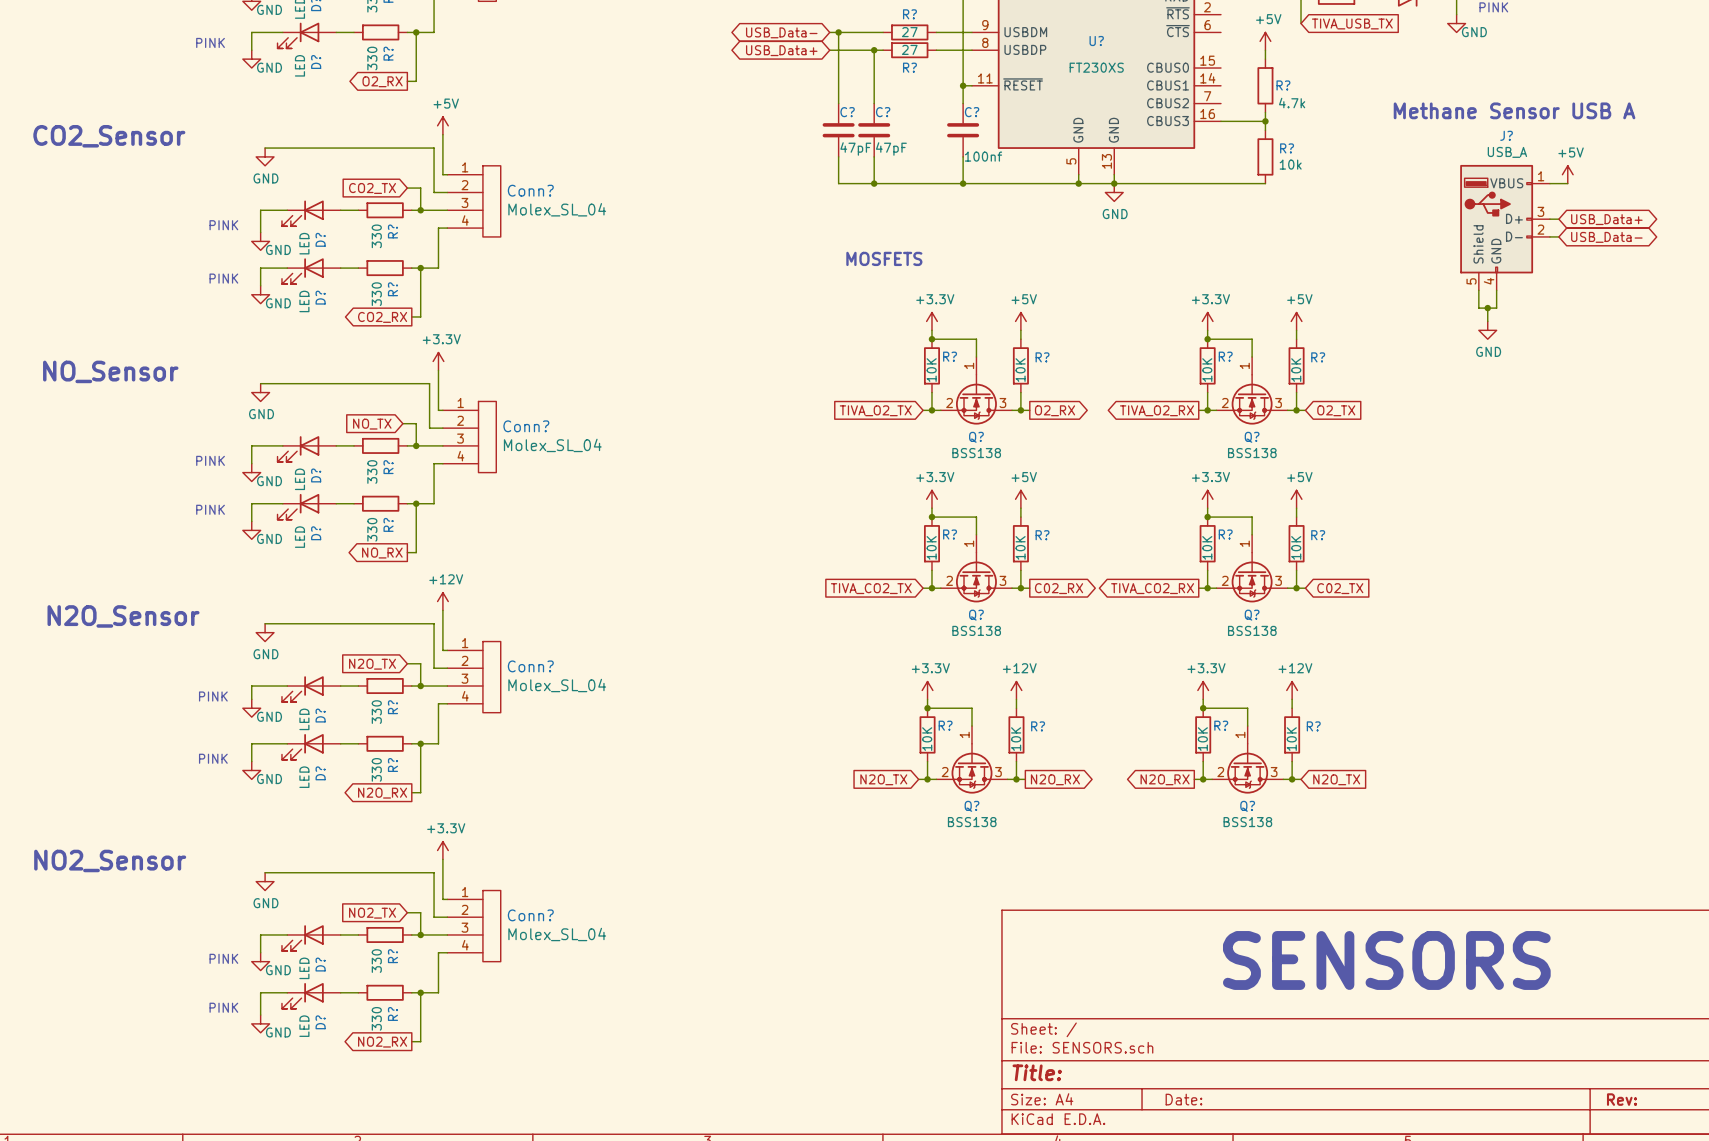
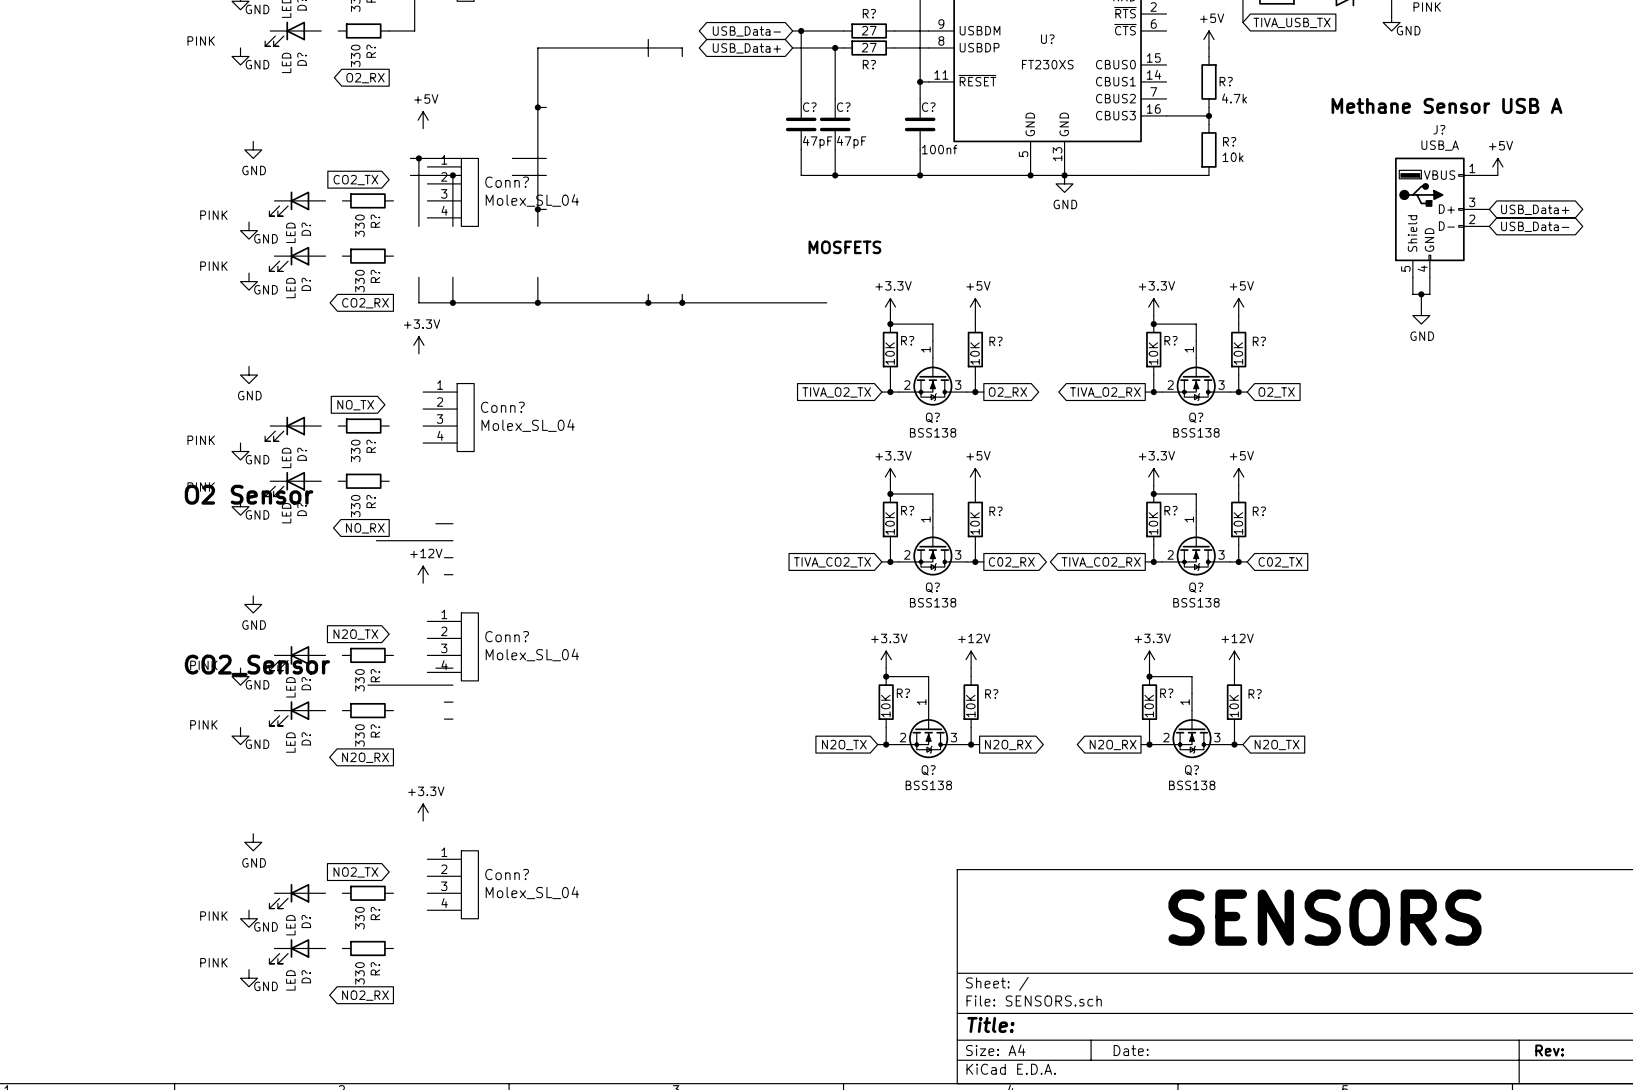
wire: (282, 32) (251, 32) (251, 50) -> none
wire: (336, 32) (354, 32) -> none
wire: (416, 32) (416, 81) (407, 81) -> none
junction: (416, 32) -> none
wire: none -> (648, 39) (648, 56)
wire: none -> (682, 56) (682, 47) (537, 47) (537, 226)
wire: none -> (537, 107) (546, 107)
junction: none -> (537, 107)
wire: (442, 134) (442, 174) (447, 174) -> none
text: CO2_Sensor (109, 136) -> none
wire: (265, 148) (434, 148) (434, 192) (447, 192) -> none
wire: none -> (410, 158) (461, 158)
junction: none -> (418, 158)
wire: none -> (512, 158) (546, 158)
wire: none -> (410, 175) (461, 175)
wire: none -> (452, 175) (452, 226)
junction: none -> (452, 175)
wire: (407, 188) (420, 188) (420, 210) -> none
wire: (287, 210) (260, 210) (260, 232) -> none
wire: (340, 210) (358, 210) -> none
wire: (411, 210) (447, 210) -> (512, 175) (546, 175)
junction: (420, 210) -> none
wire: none -> (537, 209) (546, 209)
junction: none -> (537, 209)
wire: (438, 228) (447, 228) -> (418, 217) (418, 158)
wire: (438, 236) (438, 268) (411, 268) -> none
wire: (287, 268) (260, 268) (260, 285) -> none
wire: (340, 268) (358, 268) -> none
wire: (420, 268) (420, 316) (411, 316) -> none
junction: (420, 268) -> none
wire: none -> (418, 277) (418, 302) (826, 302)
wire: none -> (452, 277) (452, 302)
wire: none -> (537, 277) (537, 302)
wire: none -> (648, 294) (648, 302)
wire: none -> (682, 294) (682, 302)
junction: none -> (452, 302)
junction: none -> (537, 302)
junction: none -> (648, 302)
junction: none -> (682, 302)
wire: (438, 370) (438, 410) (442, 410) -> none
text: NO_Sensor (110, 371) -> none
wire: (260, 383) (429, 383) (429, 428) (442, 428) -> none
wire: (402, 423) (416, 423) (416, 445) -> none
wire: (282, 445) (251, 445) (251, 463) -> none
wire: (336, 445) (354, 445) -> none
wire: (407, 445) (442, 445) -> none
junction: (416, 445) -> none
wire: (442, 463) (434, 463) (434, 503) (407, 503) -> none
wire: (282, 503) (251, 503) (251, 521) -> none
wire: (336, 503) (354, 503) -> (435, 523) (452, 523)
wire: (416, 503) (416, 552) (407, 552) -> none
junction: (416, 503) -> none
text: none -> O2 Sensor (249, 494)
wire: none -> (376, 540) (452, 540)
wire: none -> (444, 557) (452, 557)
wire: none -> (444, 574) (452, 574)
wire: (442, 610) (442, 650) (447, 650) -> none
text: N2O_Sensor (123, 616) -> none
wire: (265, 623) (434, 623) (434, 668) (447, 668) -> none
wire: (407, 663) (420, 663) (420, 686) -> none
wire: (287, 686) (251, 686) (251, 699) -> none
wire: (340, 686) (358, 686) -> (435, 668) (452, 668)
wire: (411, 686) (447, 686) -> none
junction: (420, 686) -> none
text: none -> CO2_Sensor (257, 665)
wire: (447, 703) (438, 703) (438, 743) (411, 743) -> none
wire: none -> (367, 685) (452, 685)
wire: none -> (444, 702) (452, 702)
wire: (287, 743) (251, 743) (251, 761) -> none
wire: (340, 743) (358, 743) -> none
wire: (420, 743) (420, 792) (411, 792) -> none
junction: (420, 743) -> none
wire: none -> (444, 719) (452, 719)
wire: (442, 859) (442, 899) (447, 899) -> none
text: NO2_Sensor (110, 860) -> none
wire: (265, 872) (434, 872) (434, 917) (447, 917) -> none
wire: (407, 912) (420, 912) (420, 934) -> none
wire: (287, 934) (260, 934) (260, 952) -> none
wire: (340, 934) (358, 934) -> none
wire: (411, 934) (447, 934) -> none
junction: (420, 934) -> none
wire: (447, 952) (438, 952) (438, 992) (411, 992) -> none
wire: (287, 992) (260, 992) (260, 1015) -> none
wire: (340, 992) (358, 992) -> none
wire: (420, 992) (420, 1041) (411, 1041) -> none
junction: (420, 992) -> none

